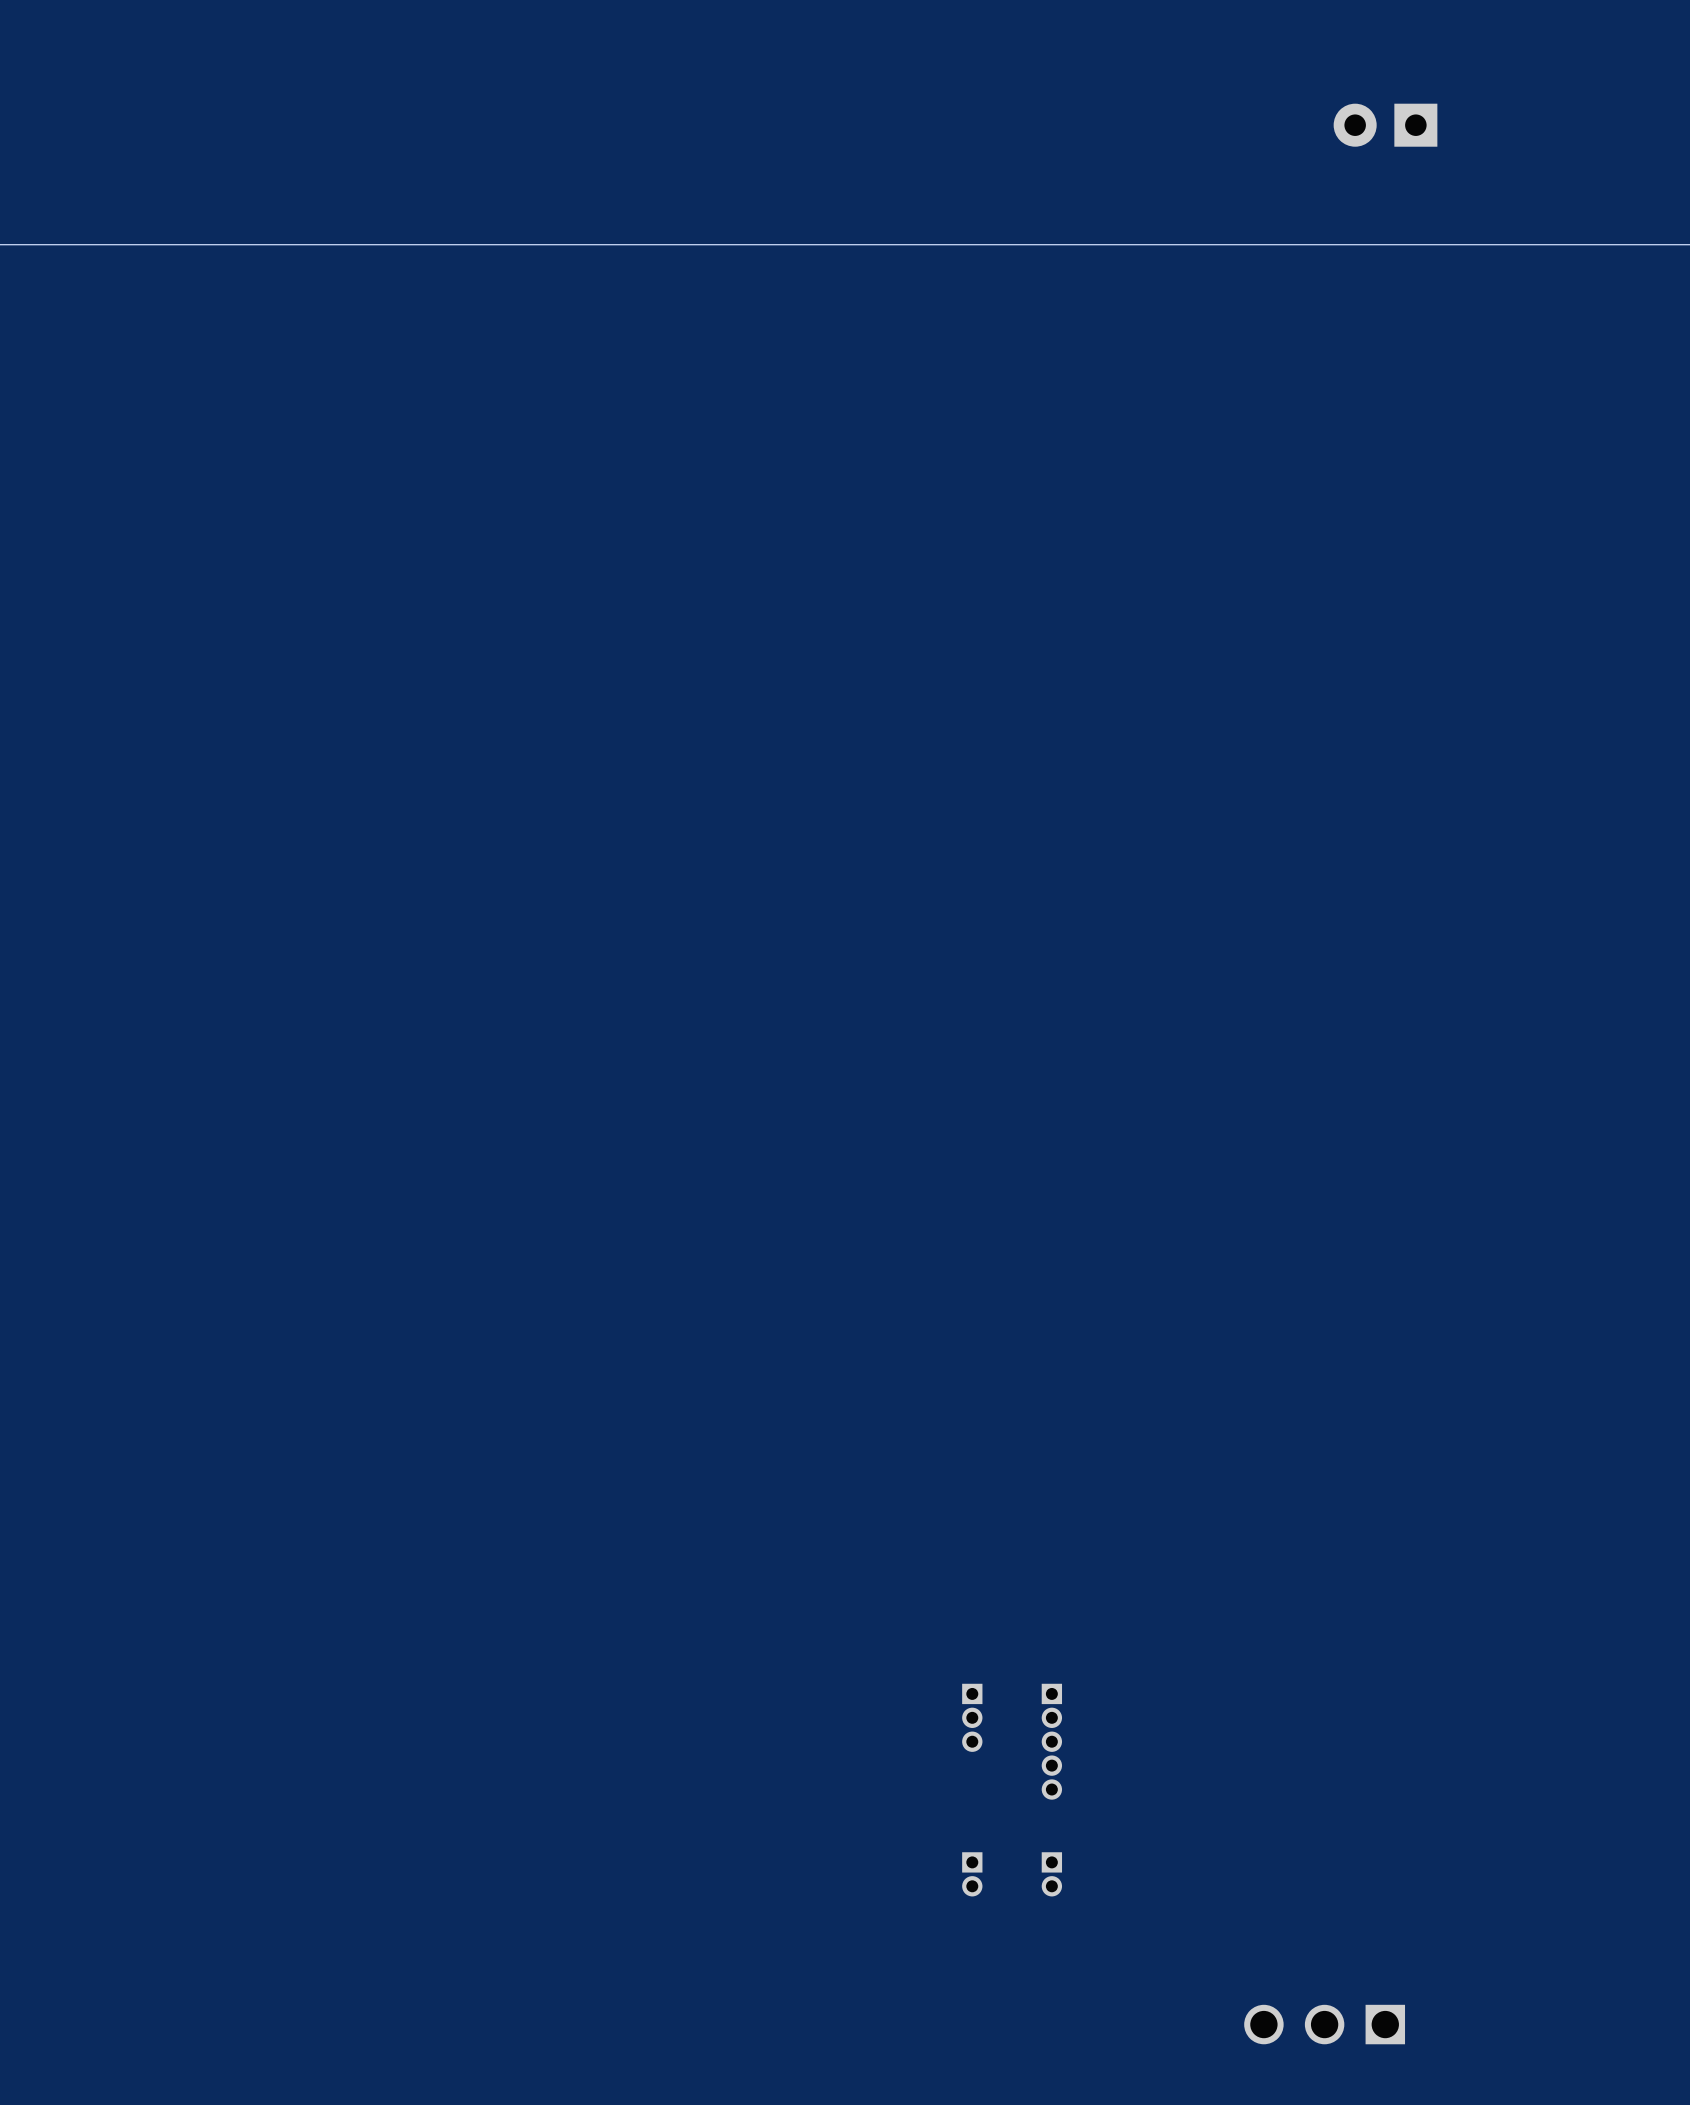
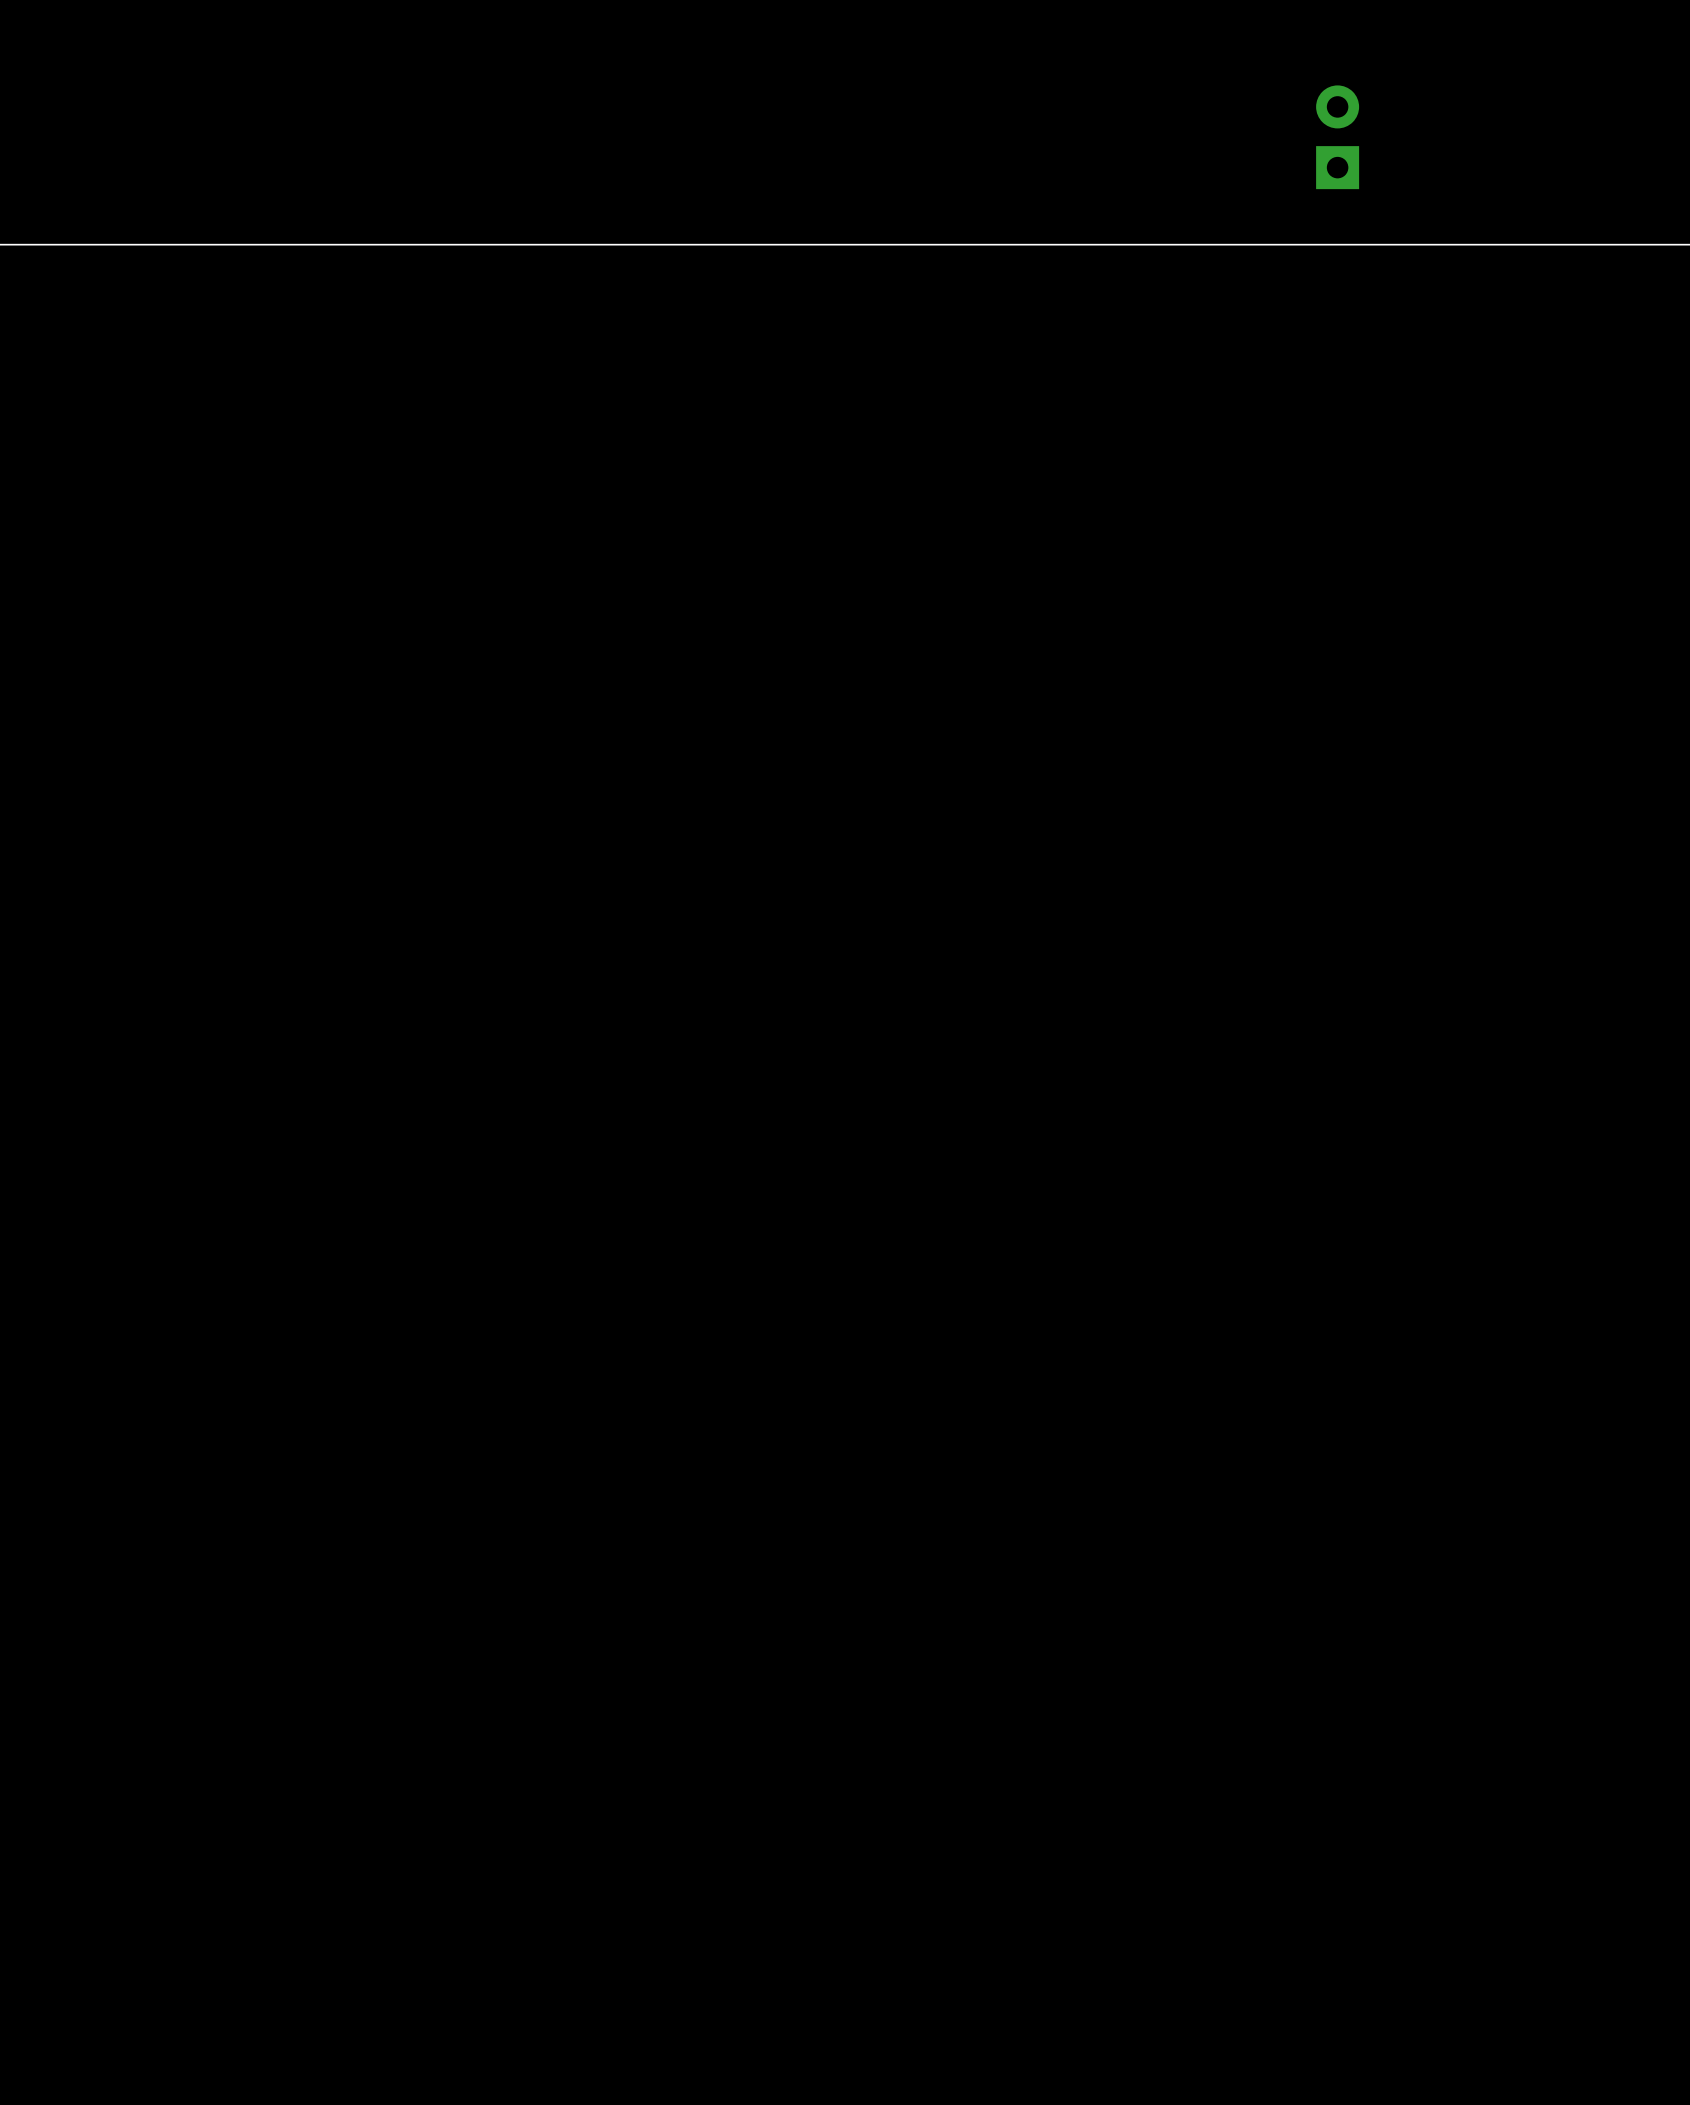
part rotation: 0° (1385, 125) -> 90° clockwise (1337, 137)
part: (972, 1717) -> none
part: (1051, 1741) -> none
part: (972, 1874) -> none
part: (1051, 1874) -> none
part: (1324, 2024) -> none

